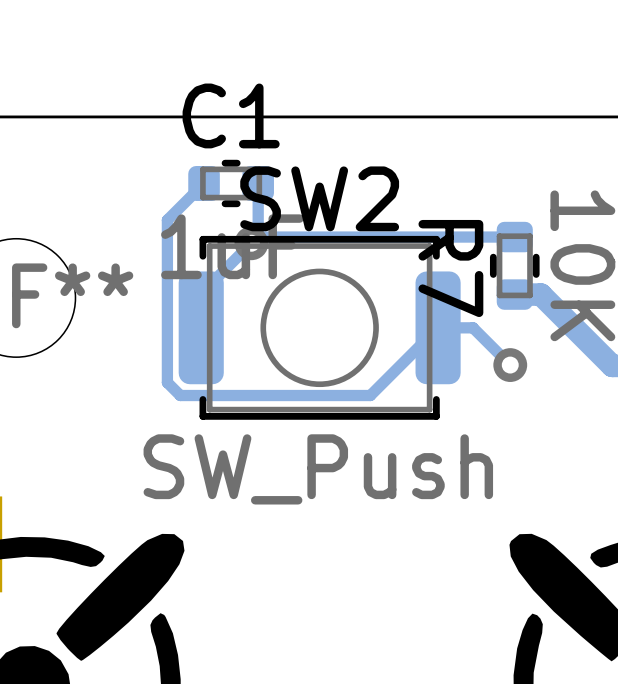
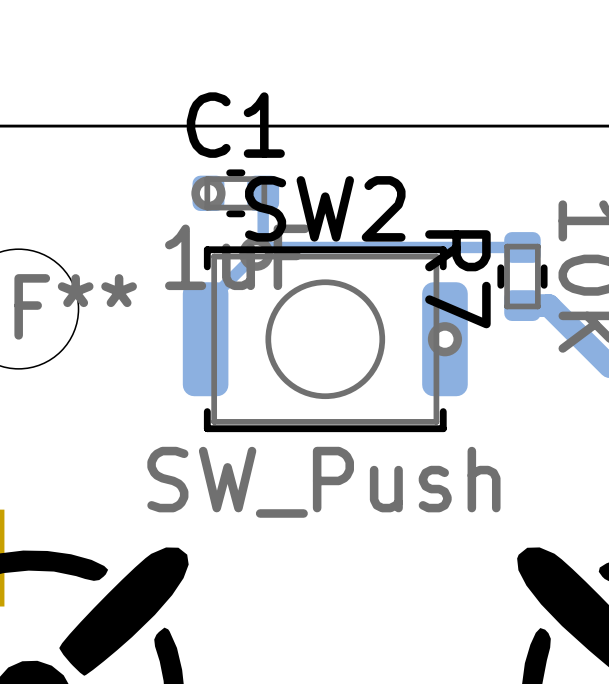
track: (204, 183) (167, 220) (167, 382) (180, 395) (370, 395) (438, 327) (473, 327) (510, 365) -> none
via: none -> (208, 193)
via position: (510, 365) -> (444, 339)

